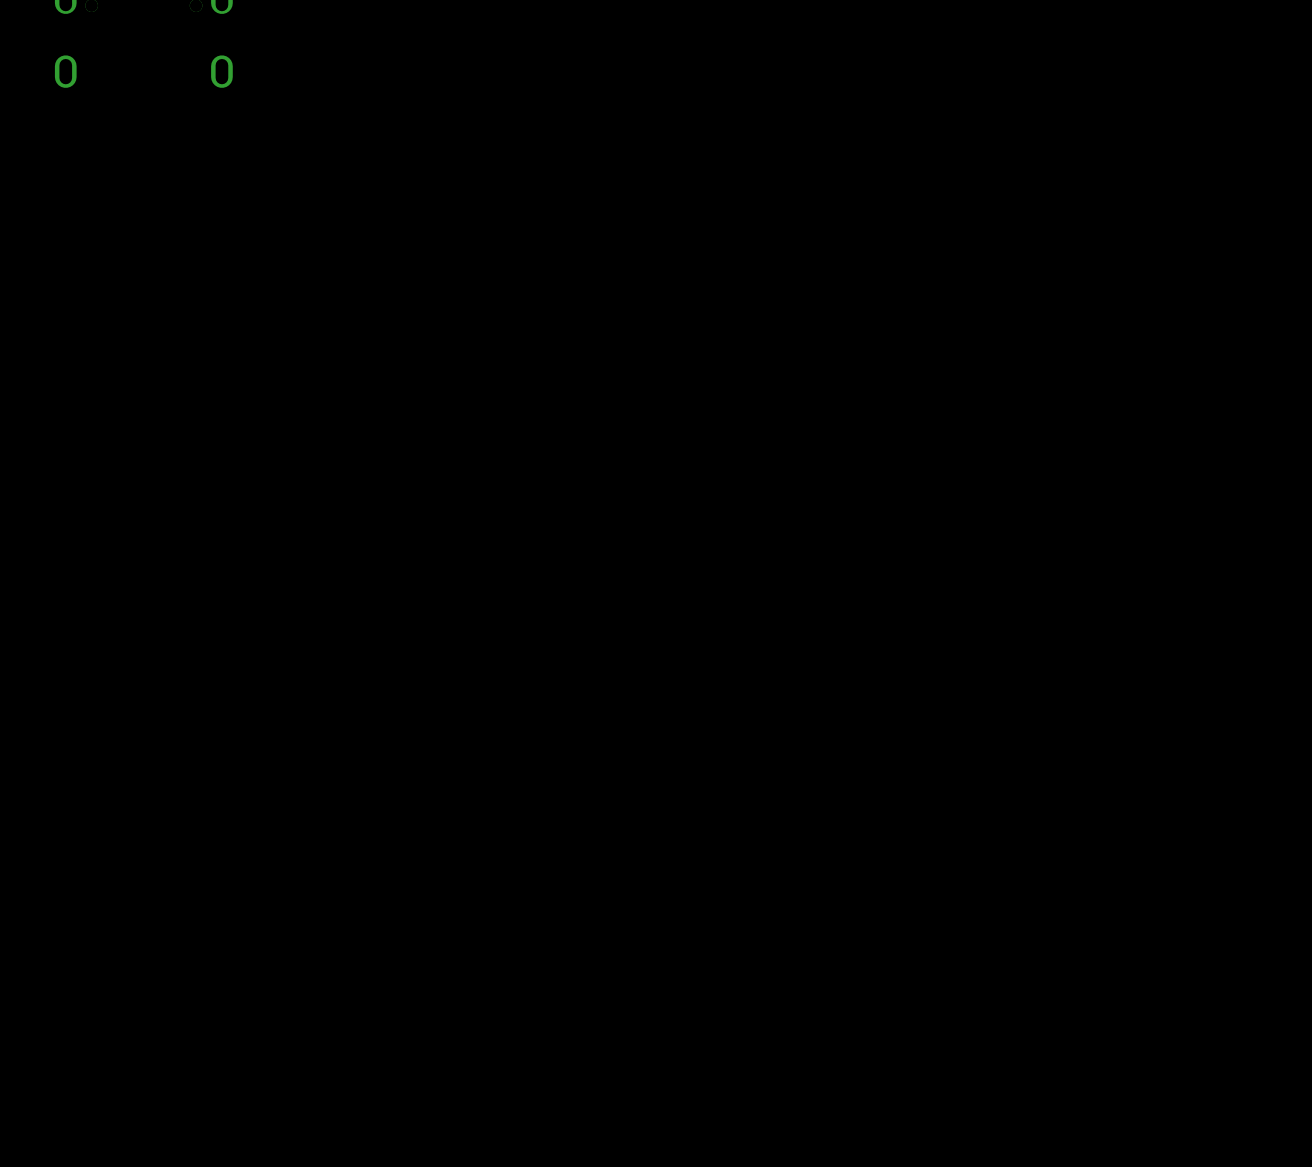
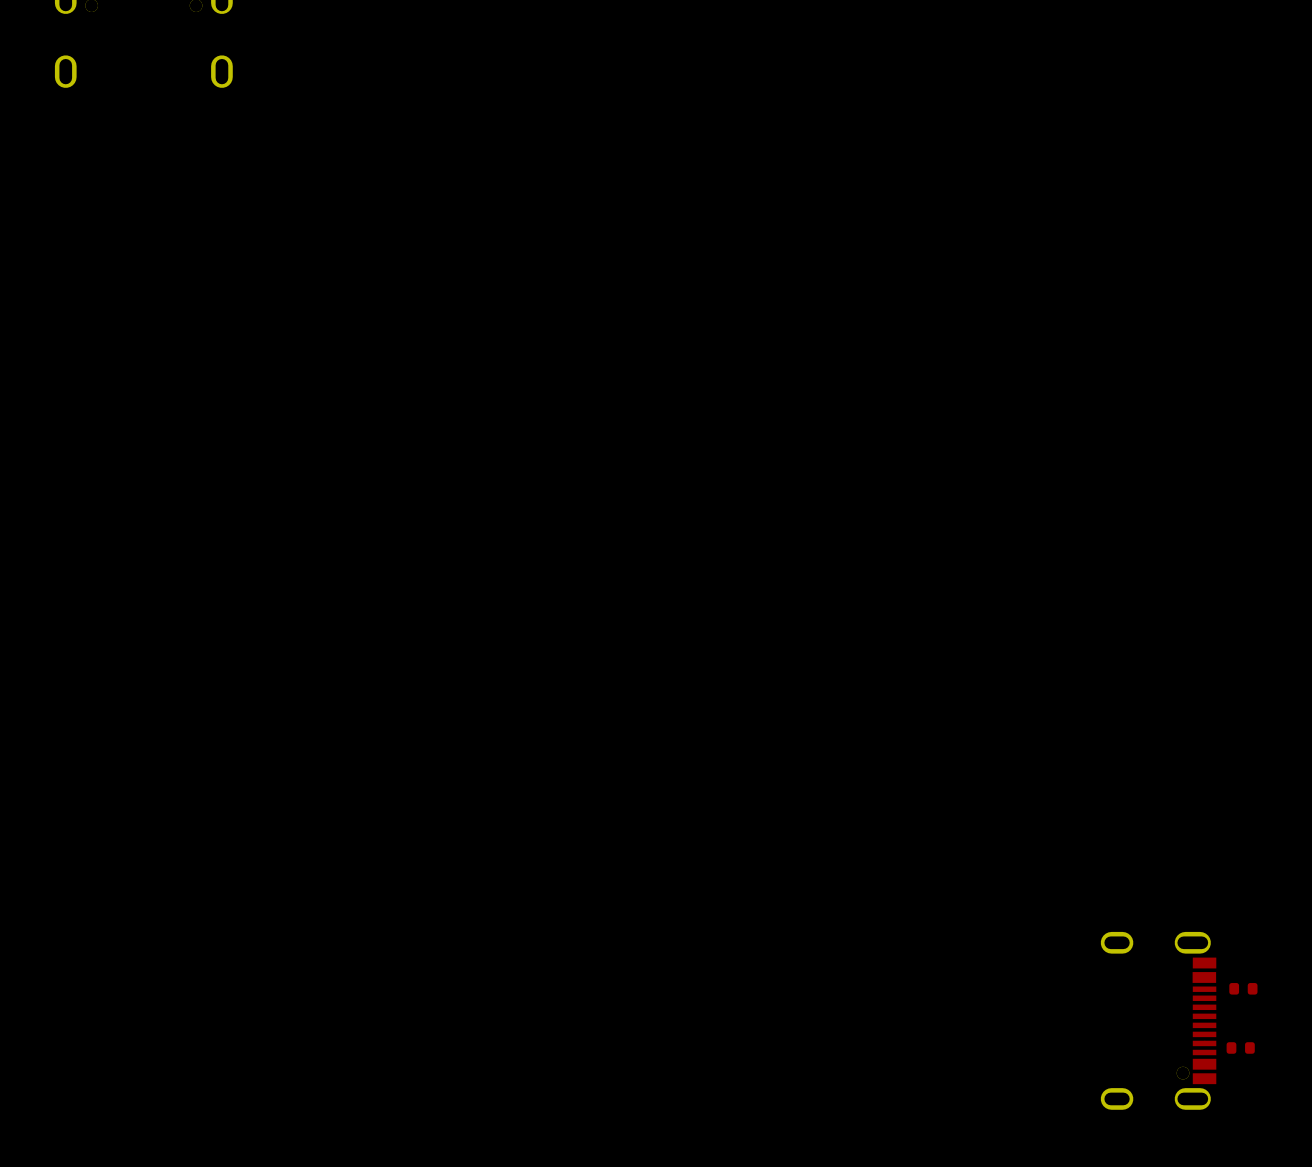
part: none -> (1243, 988)
part: none -> (1158, 1020)
part: none -> (1240, 1047)

